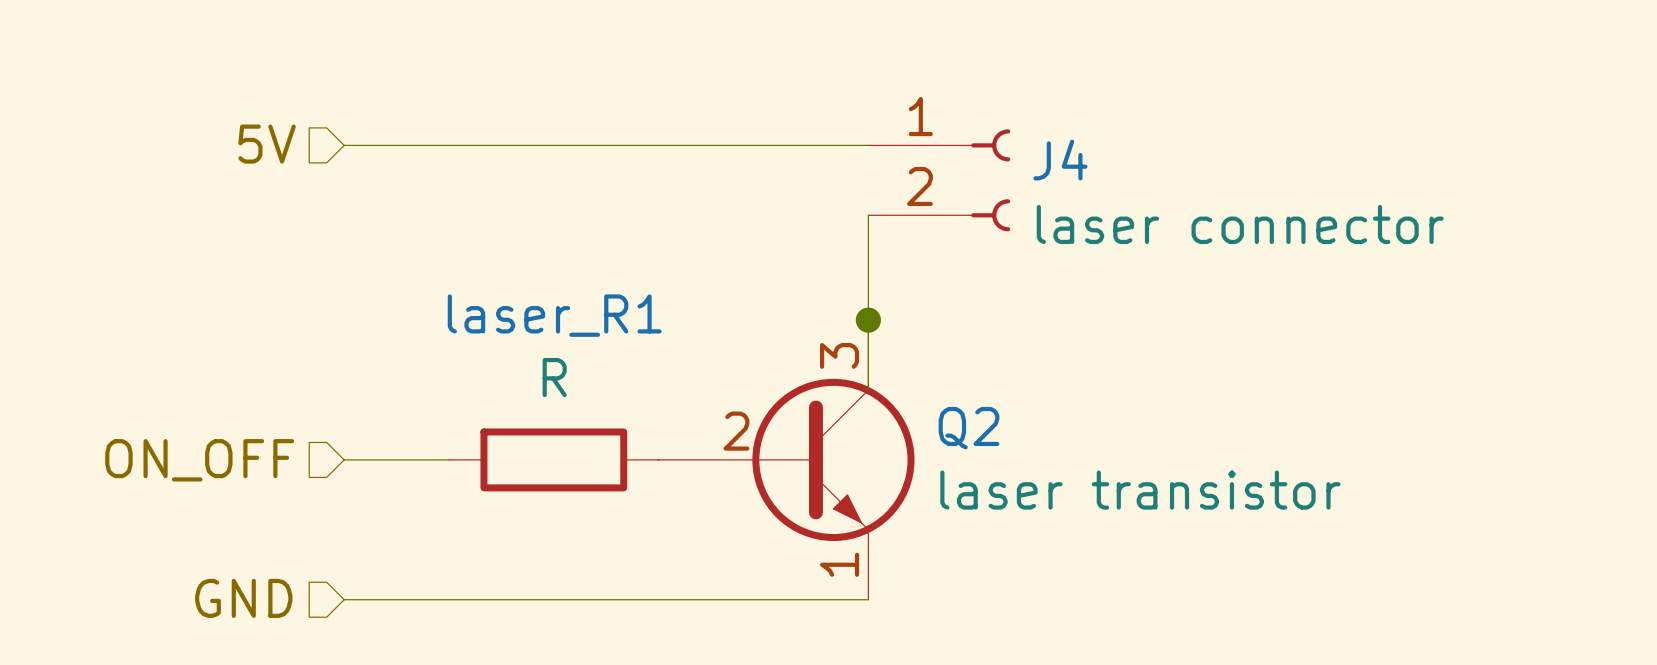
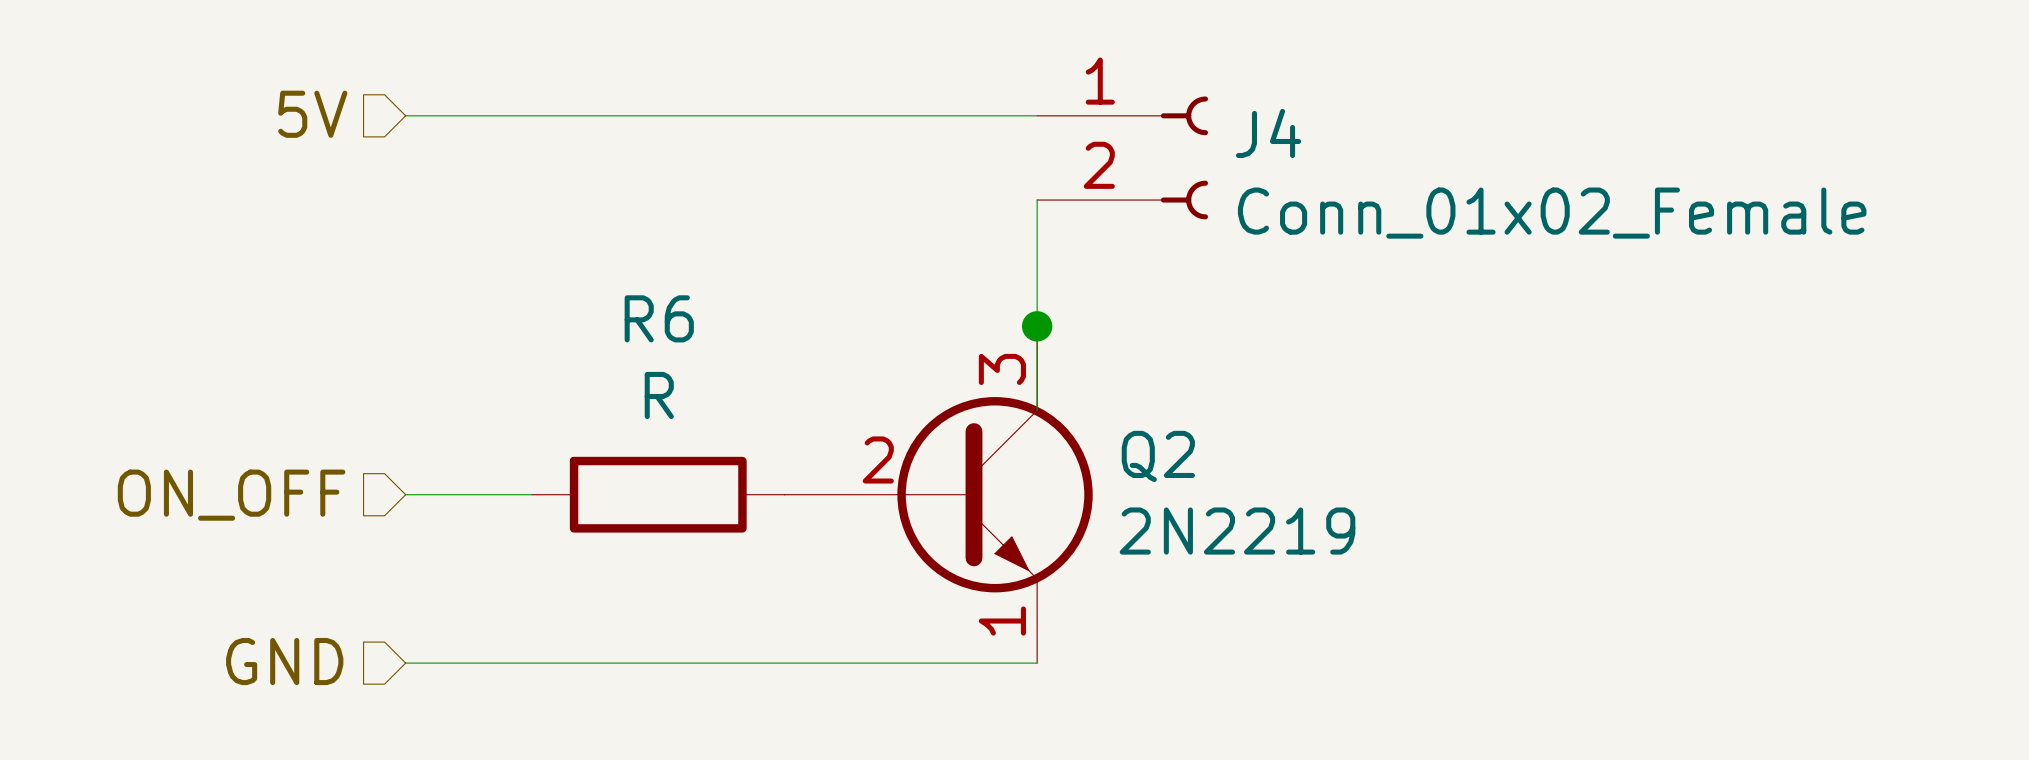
J4 value: laser connector (1240, 224) -> Conn_01x02_Female (1552, 213)
laser_R1 name: laser_R1 (554, 315) -> R6 (659, 318)
Q2 value: laser transistor (1140, 490) -> 2N2219 (1237, 531)

